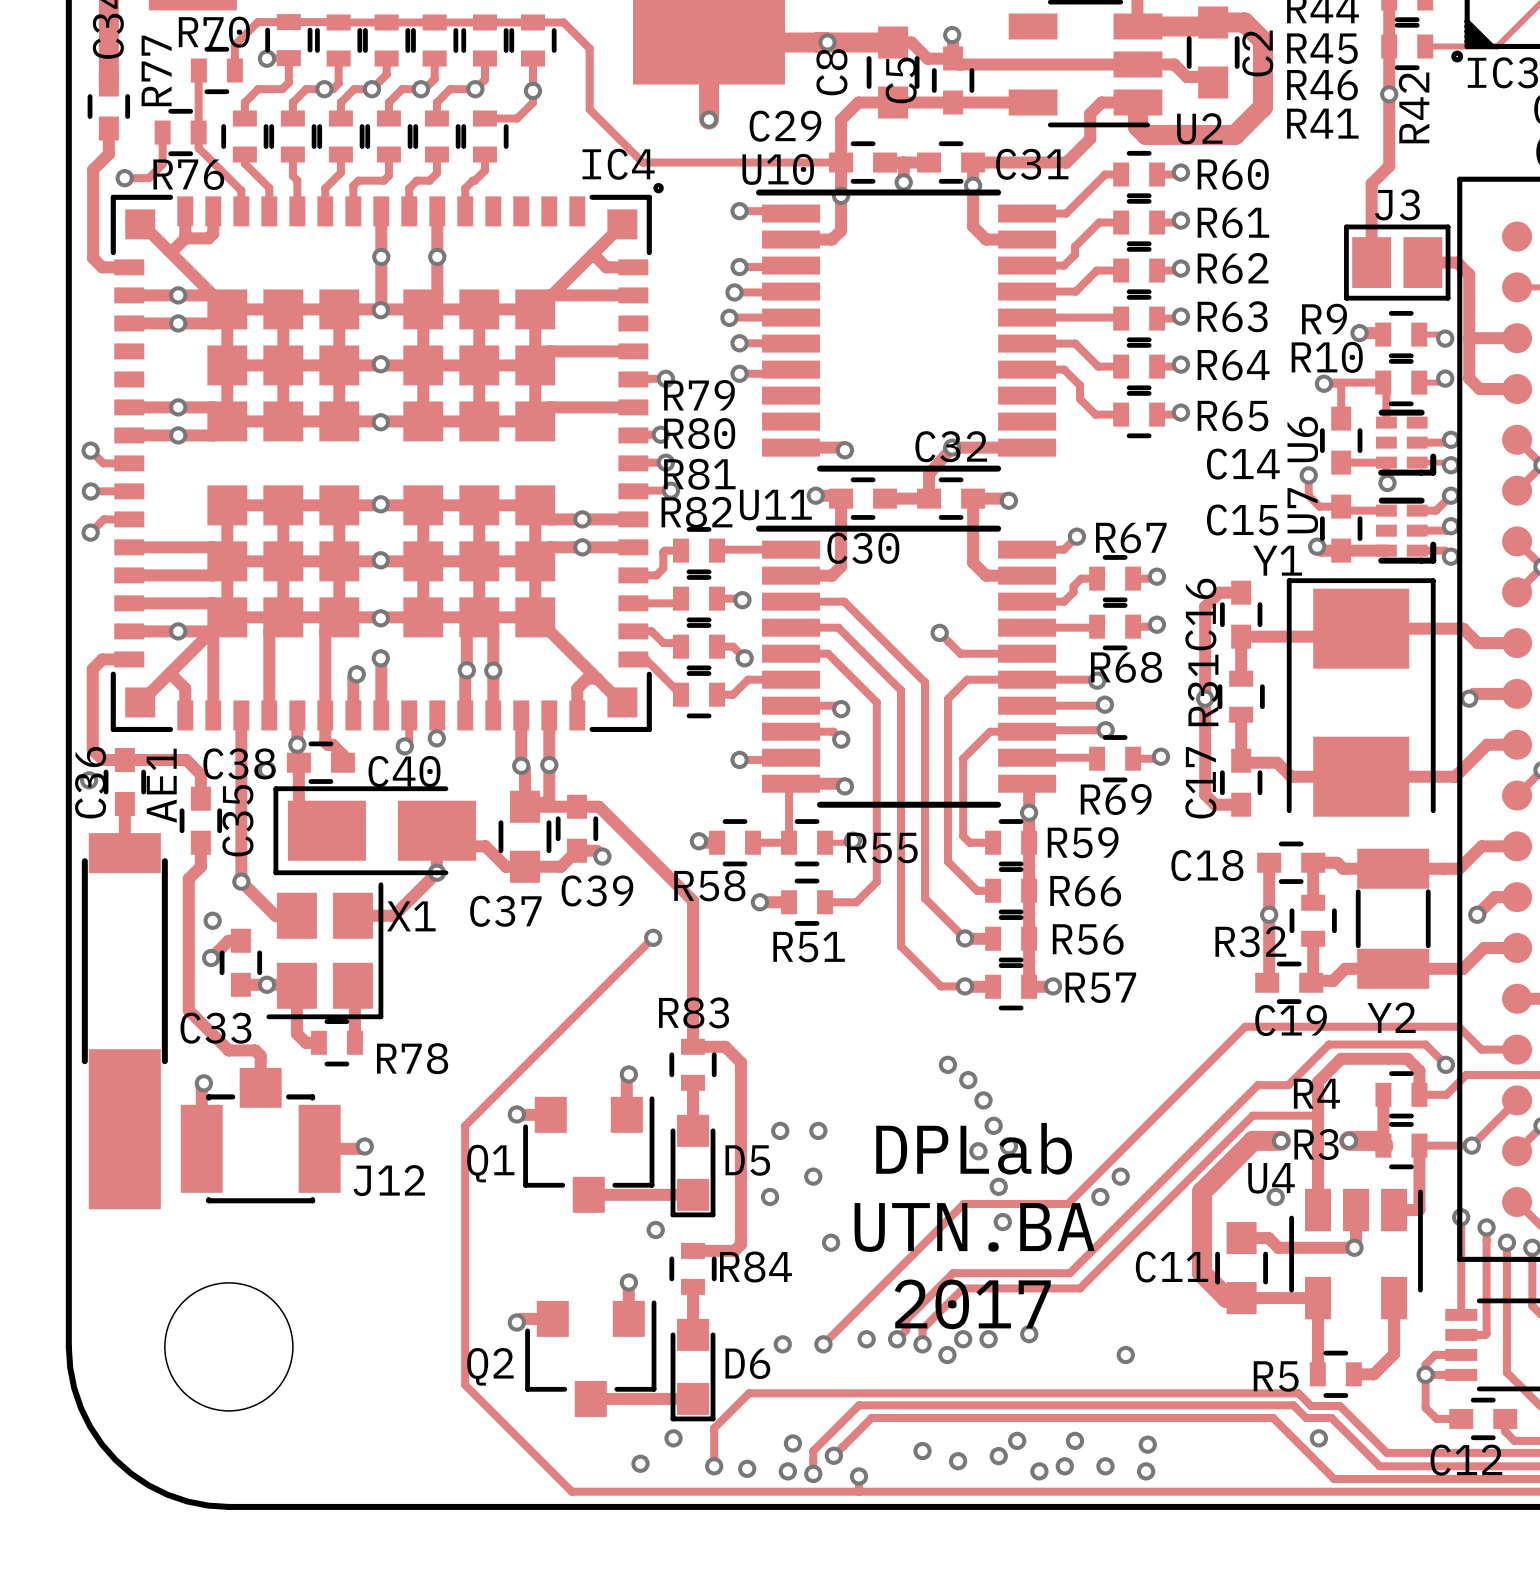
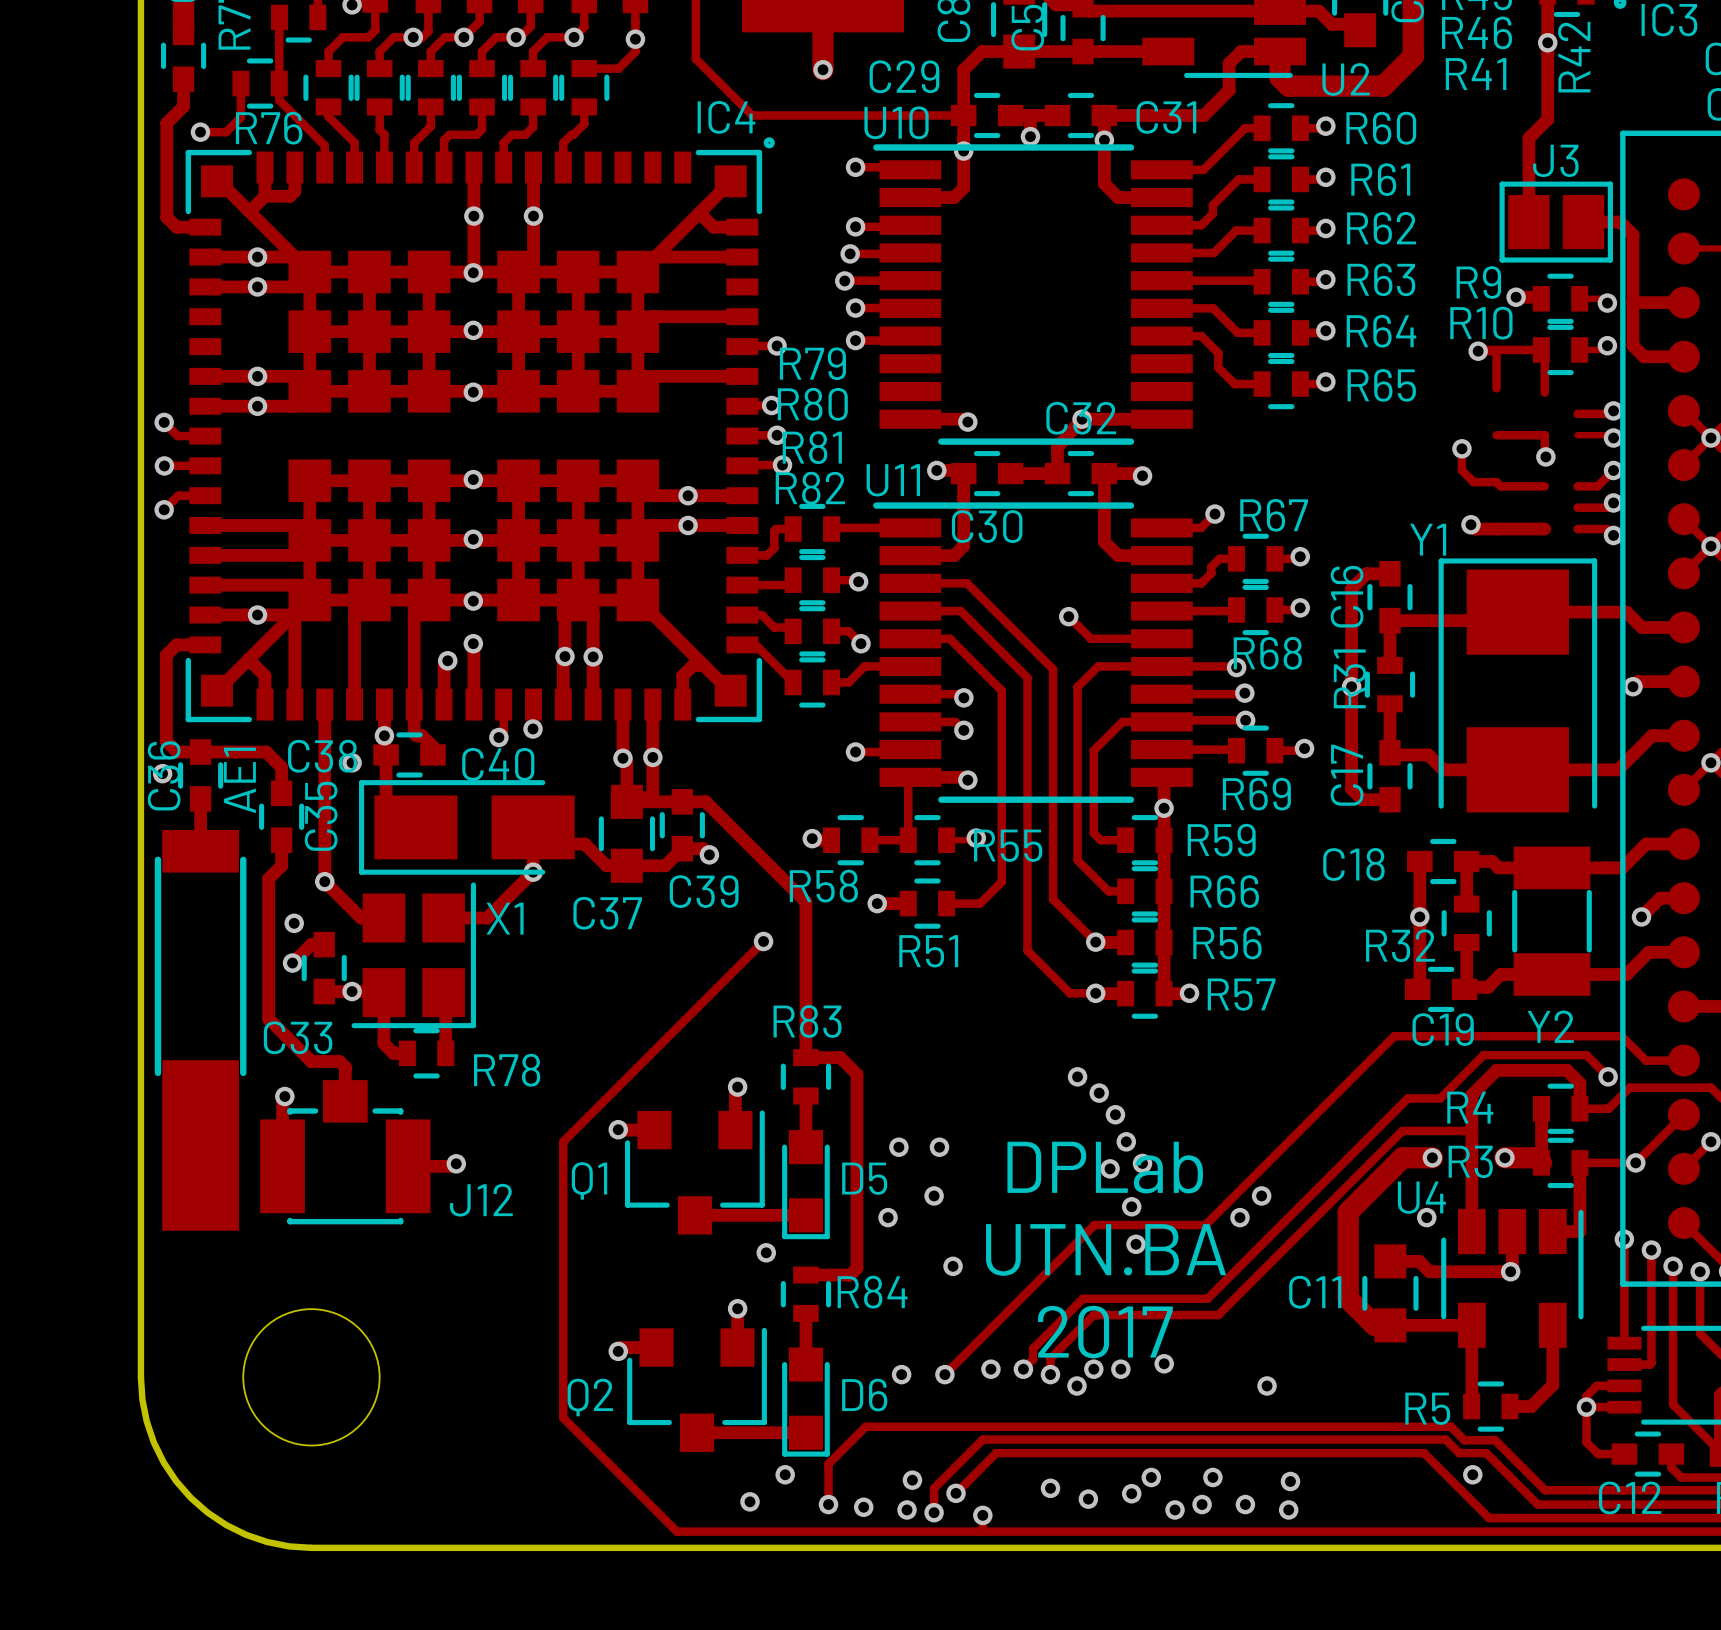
C14: (1341, 440) -> none
U6: (1406, 442) -> none
C15: (1341, 528) -> none
U7: (1406, 530) -> none

